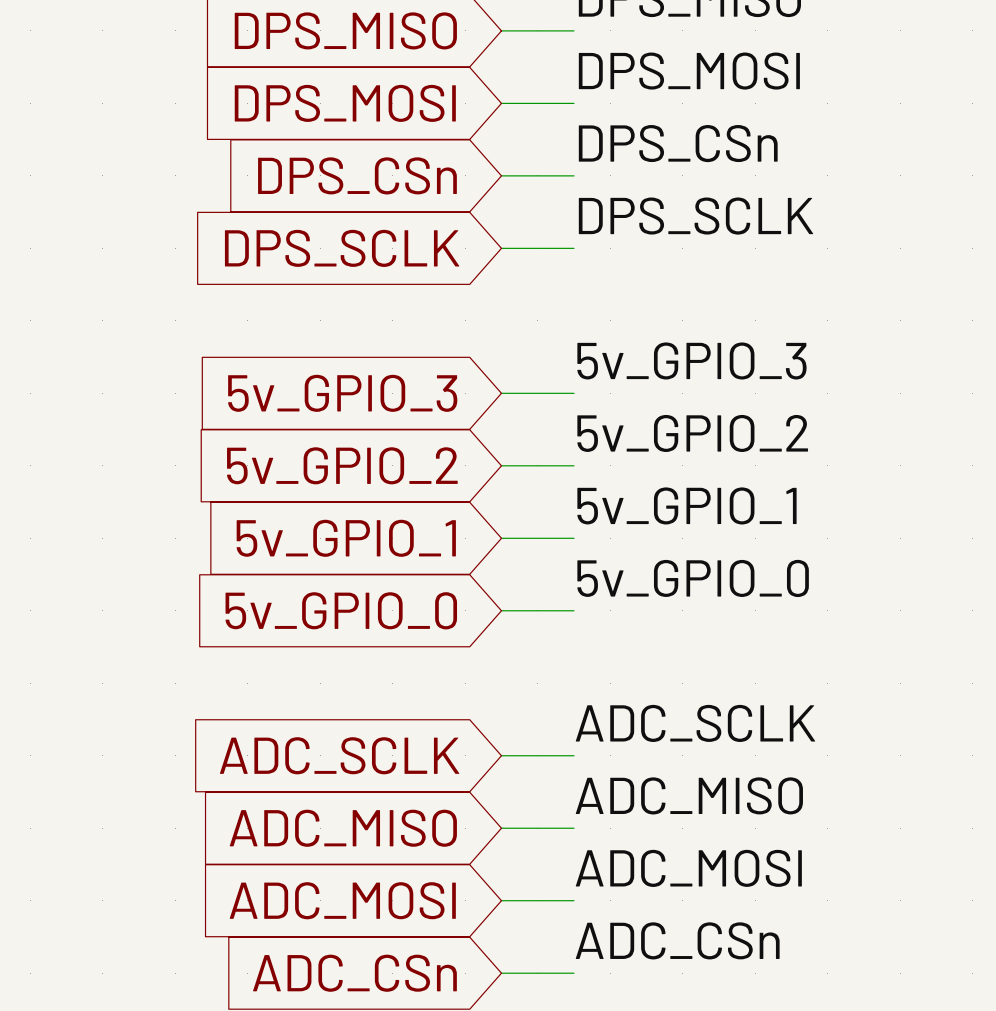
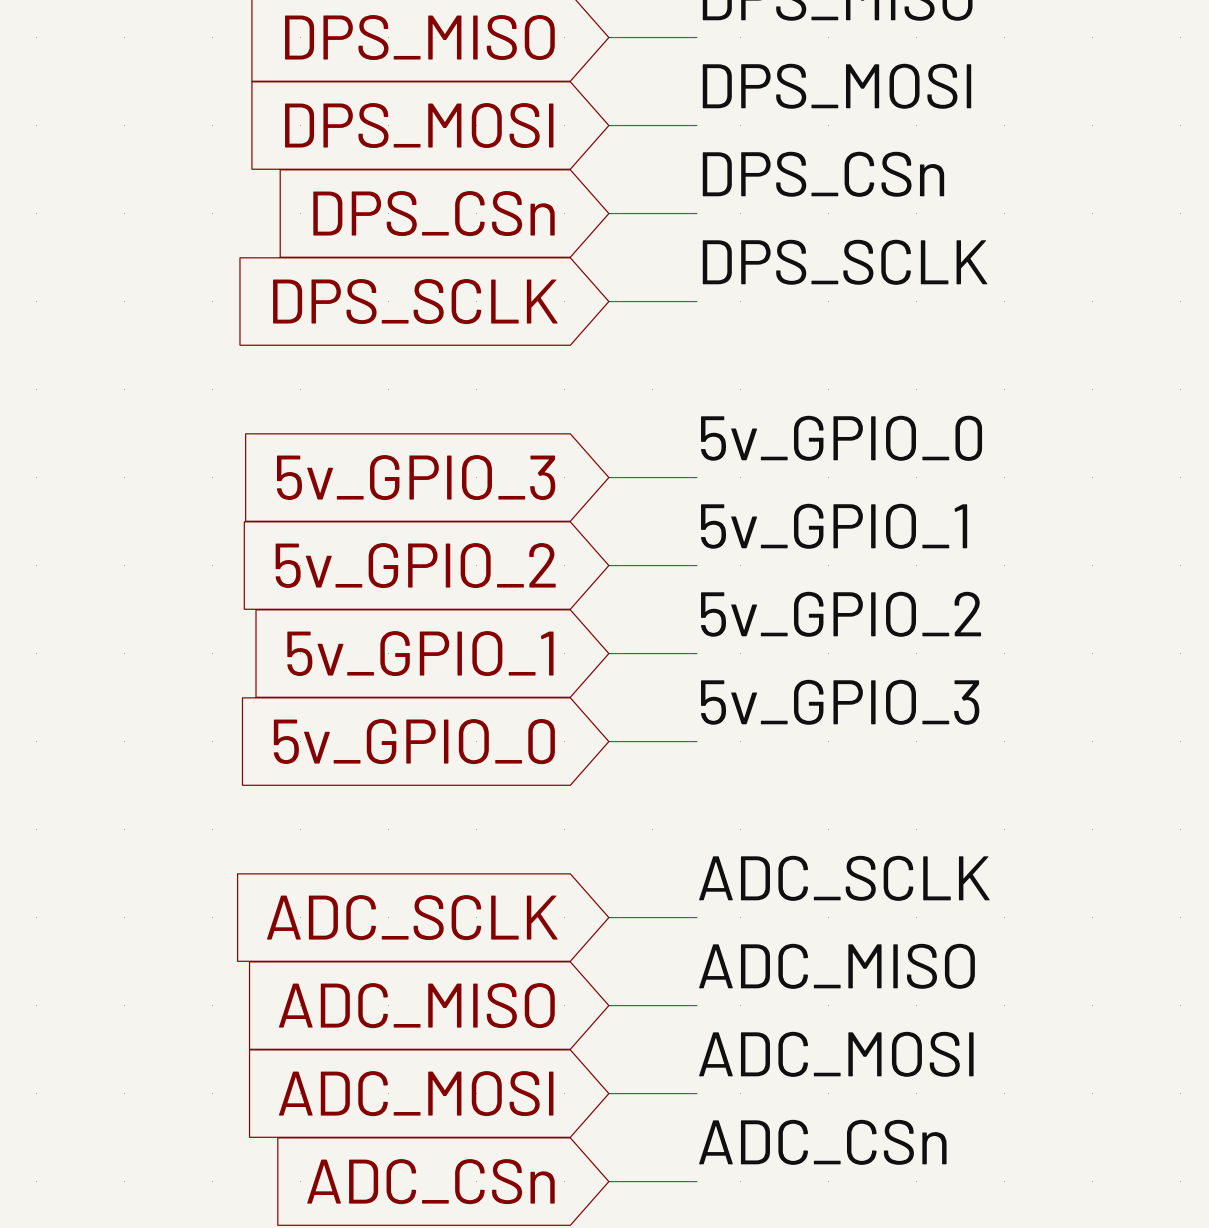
label: 5v_GPIO_3 (691, 360) -> 5v_GPIO_0 (841, 438)
label: 5v_GPIO_2 (692, 433) -> 5v_GPIO_1 (834, 526)
label: 5v_GPIO_1 (686, 505) -> 5v_GPIO_2 (841, 614)
label: 5v_GPIO_0 (693, 578) -> 5v_GPIO_3 (840, 702)

